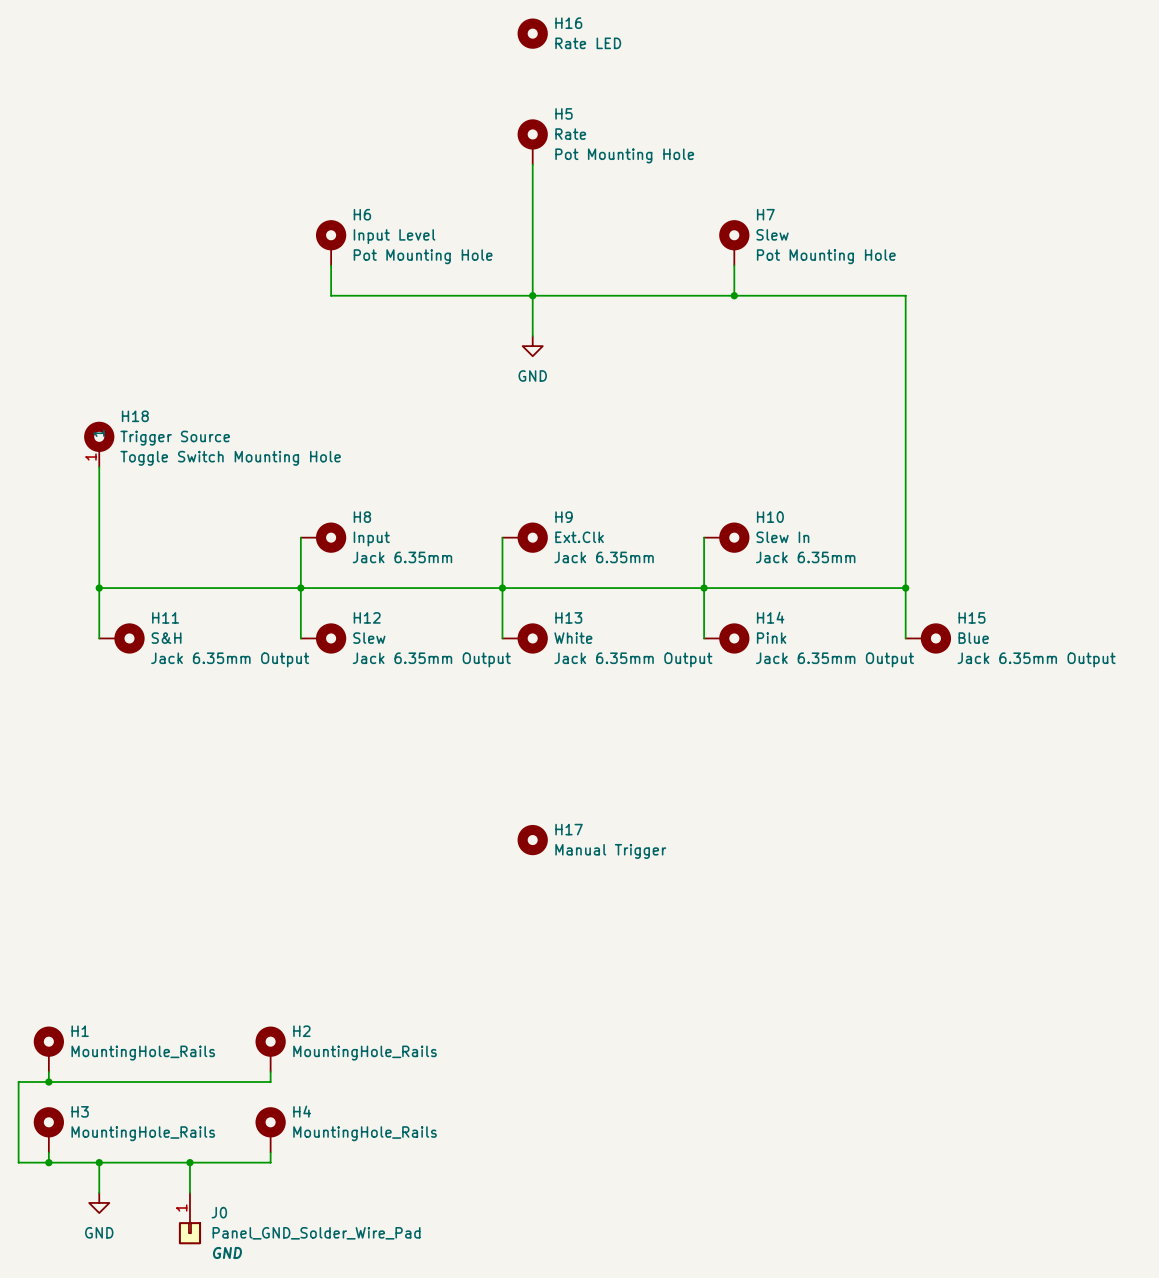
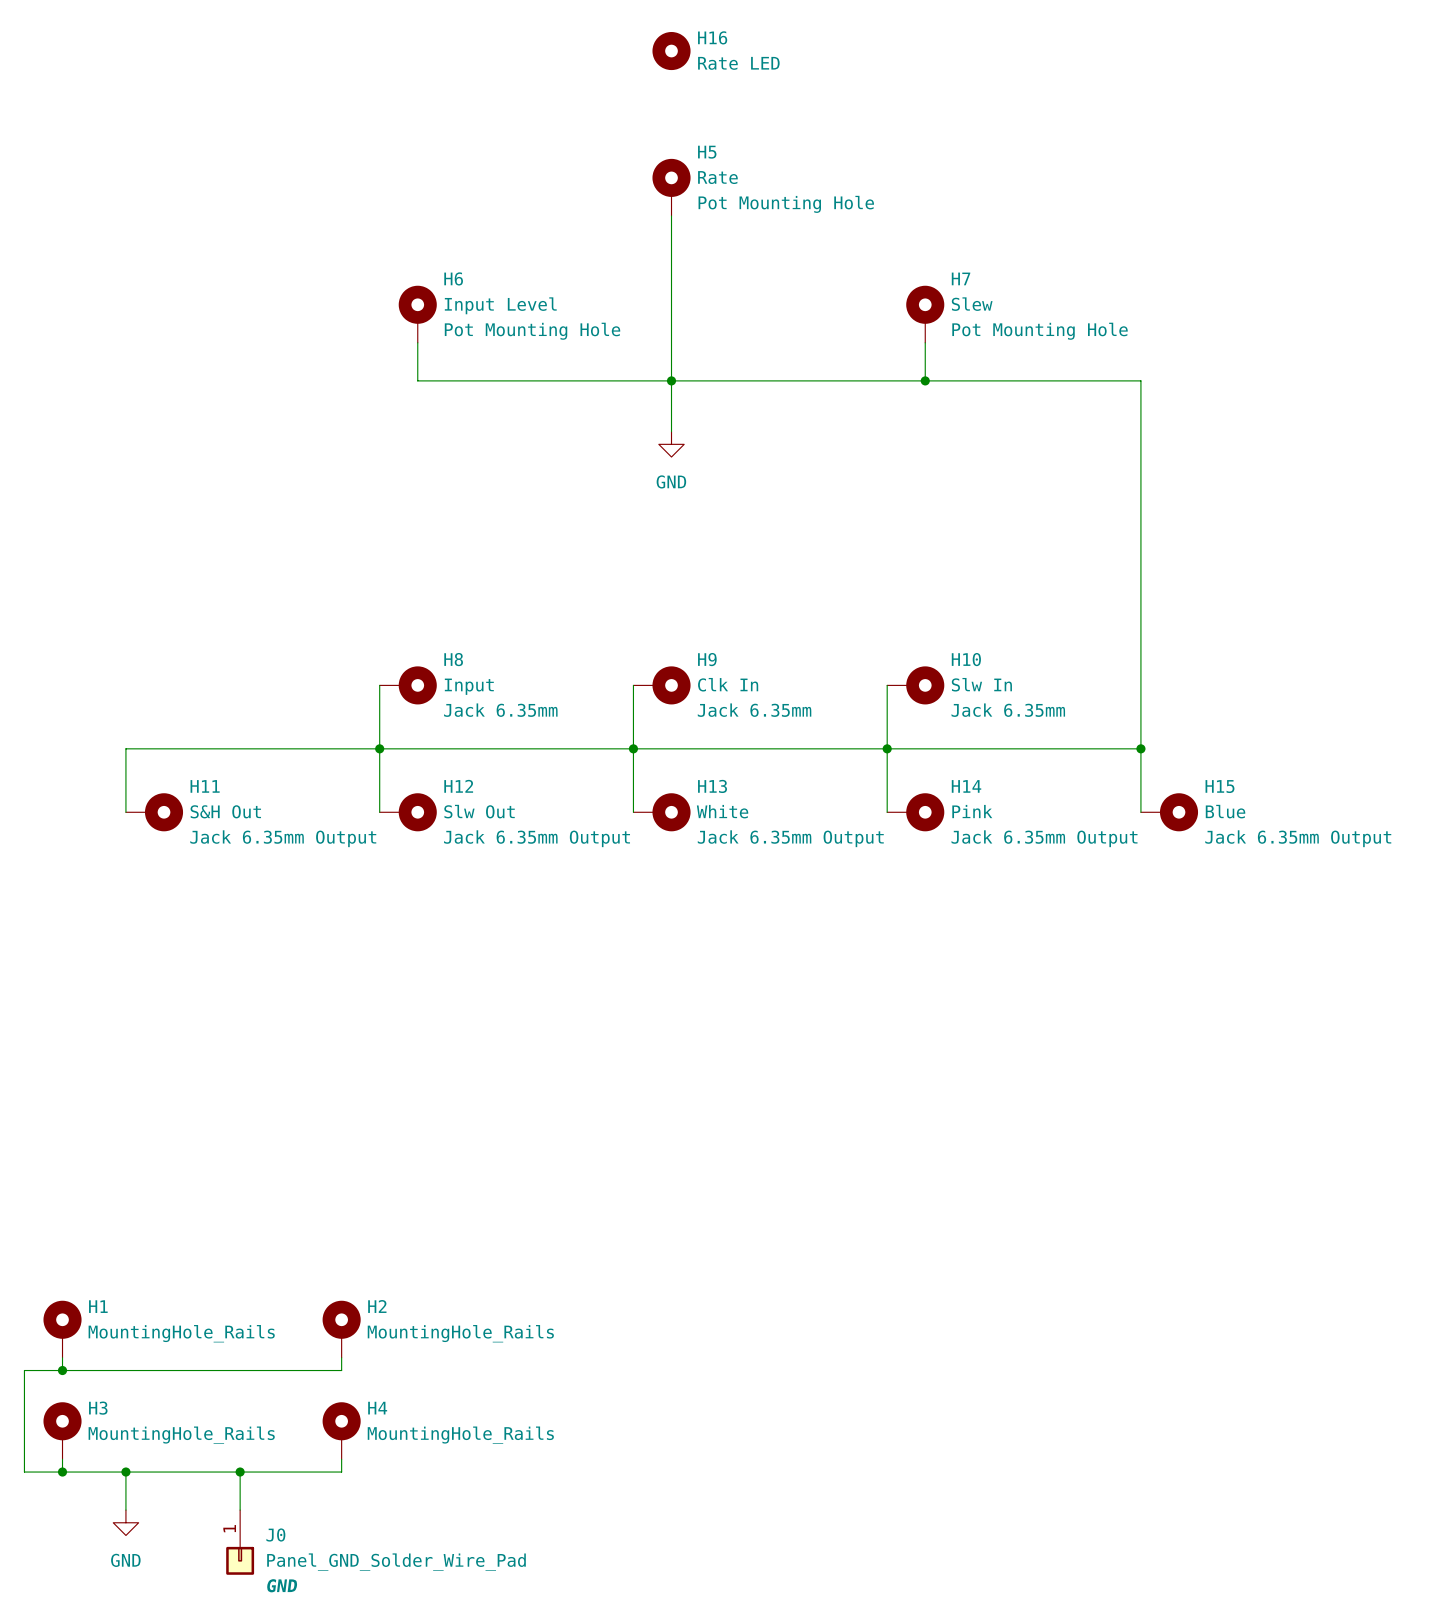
H18: Trigger Source (99, 444) -> none
wire: (99, 467) (99, 588) -> none
H9 value: Ext.Clk (579, 537) -> Clk In (728, 684)
H10 value: Slew In (782, 537) -> Slw In (981, 684)
junction: (99, 588) -> none
H11 value: S&H (166, 638) -> S&H Out (225, 811)
H12 value: Slew (369, 638) -> Slw Out (479, 811)
H17: Manual Trigger (532, 840) -> none

